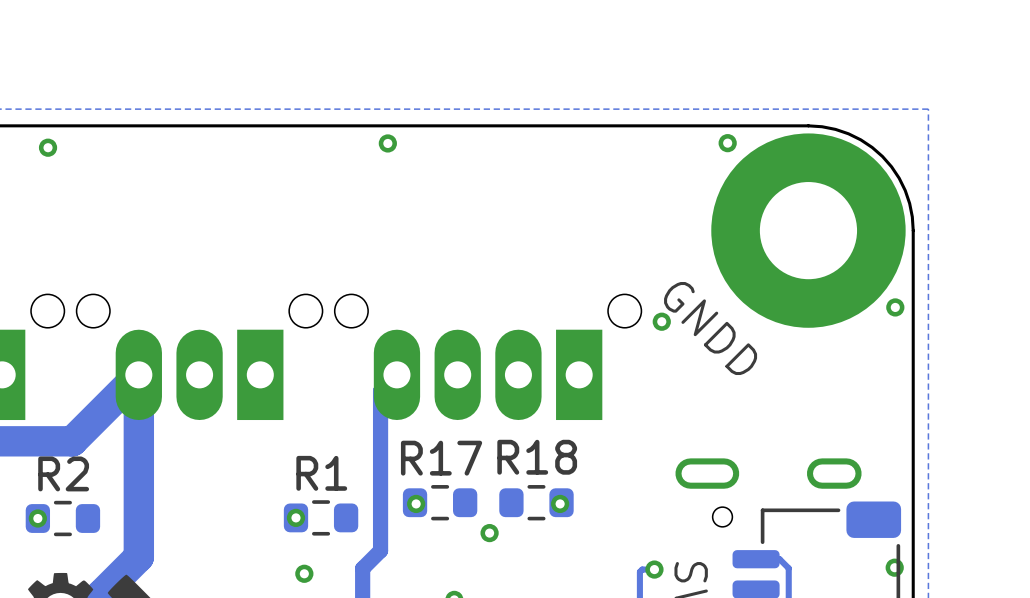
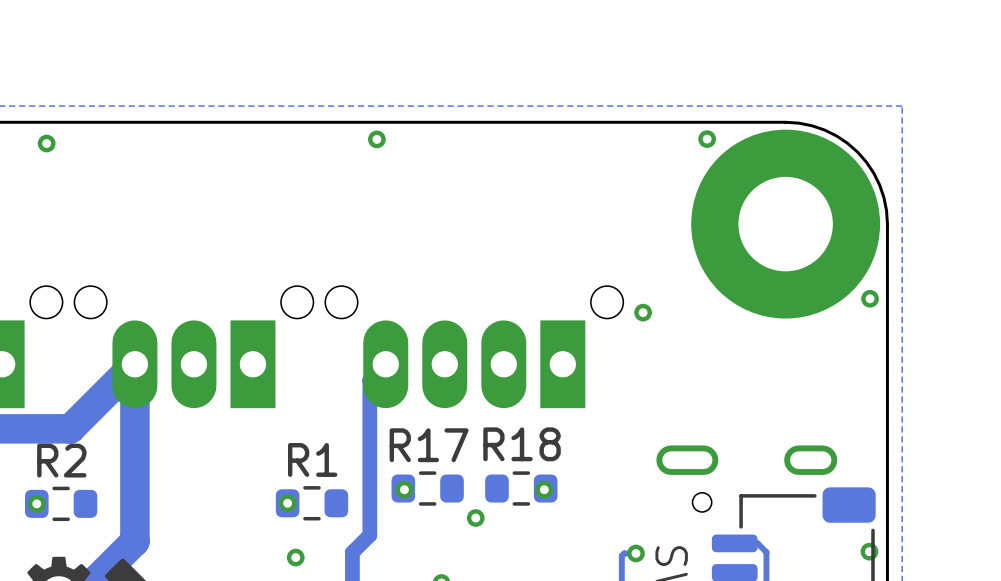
text: GNDD (710, 328) -> none

